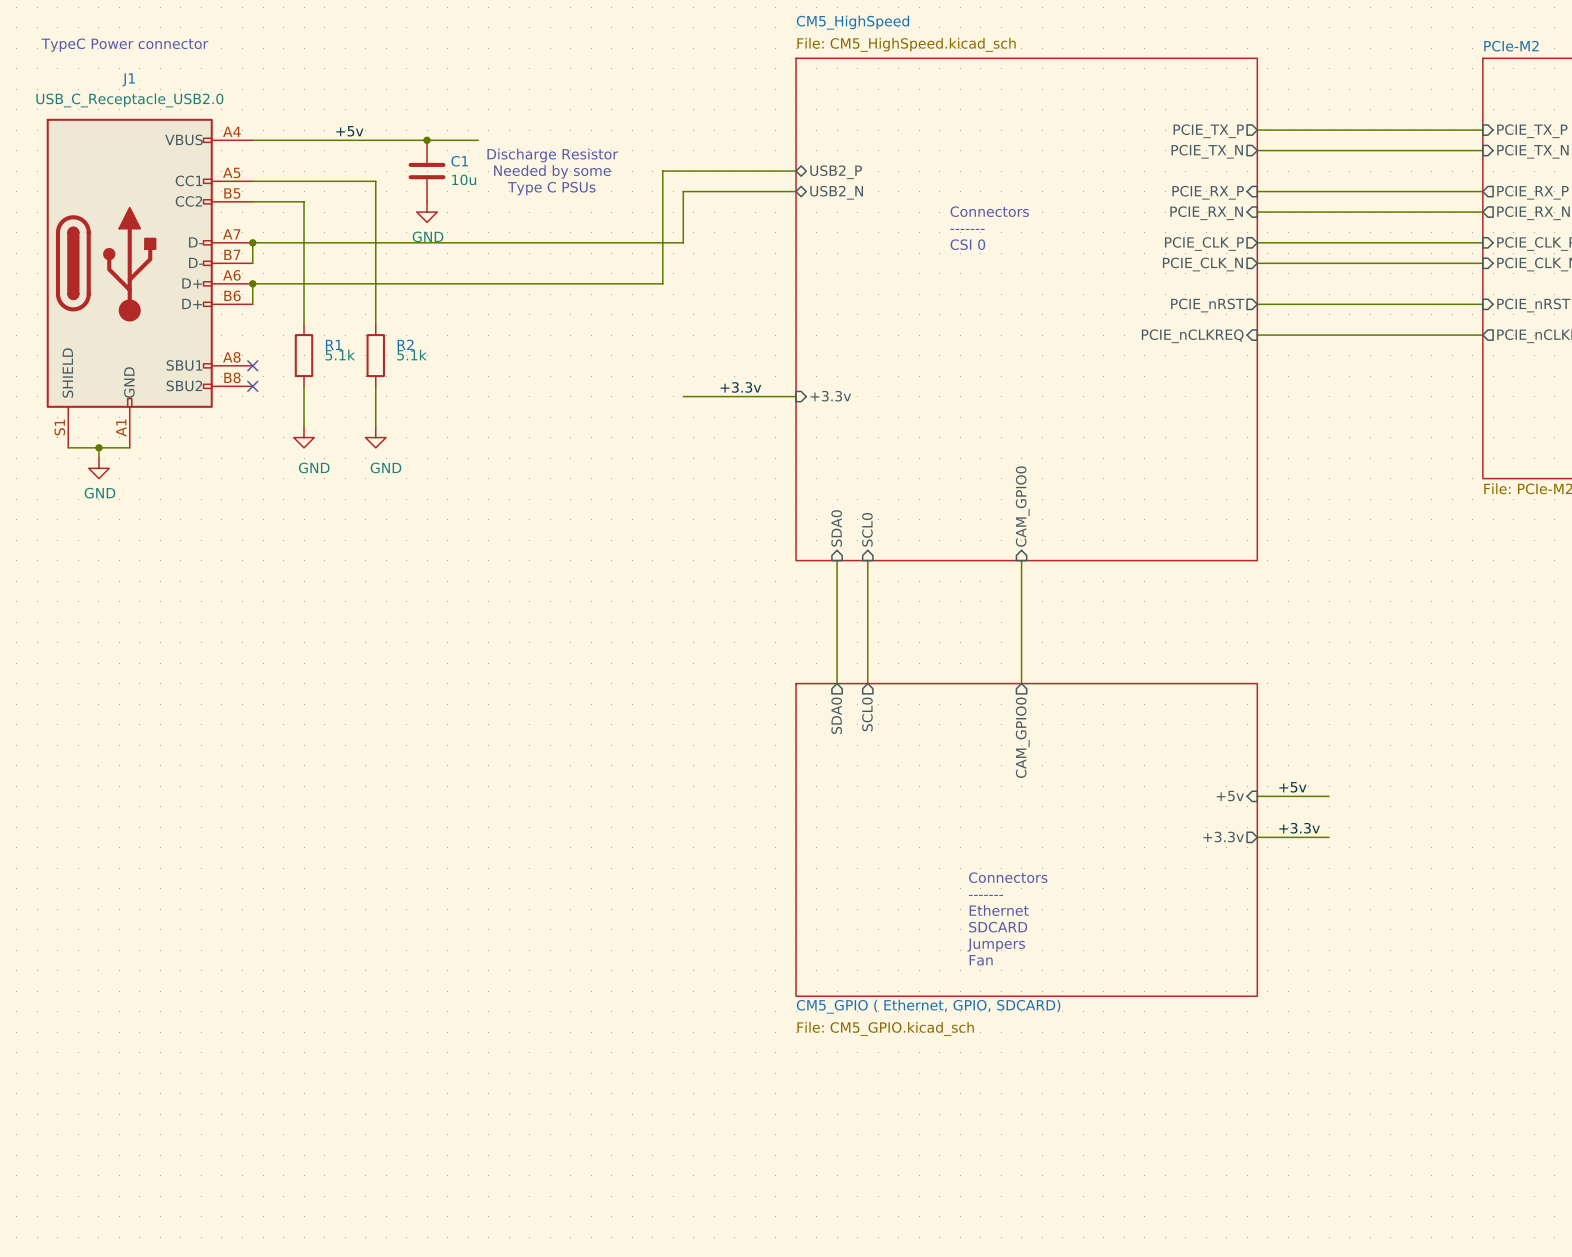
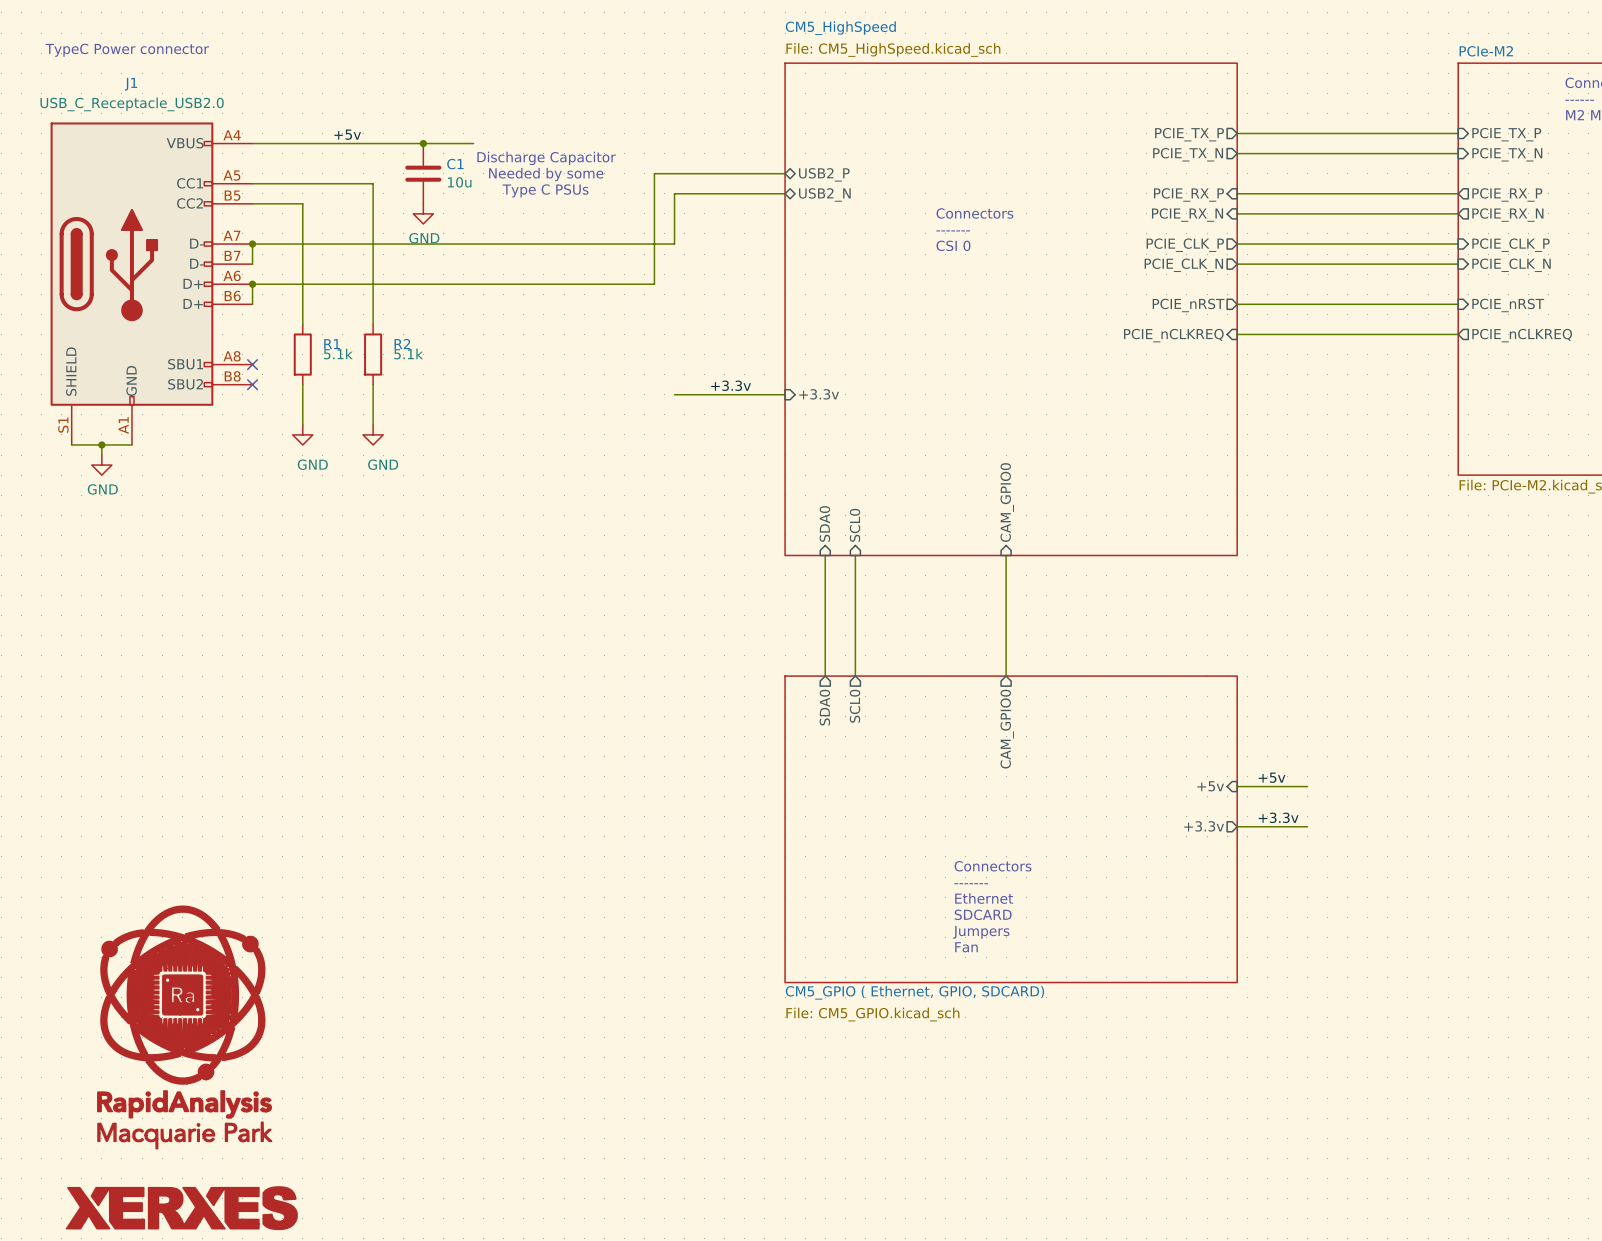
text: Discharge Resistor (552, 155) -> Discharge Capacitor (546, 158)
power symbol: none -> (184, 1027)
power symbol: none -> (181, 1208)

